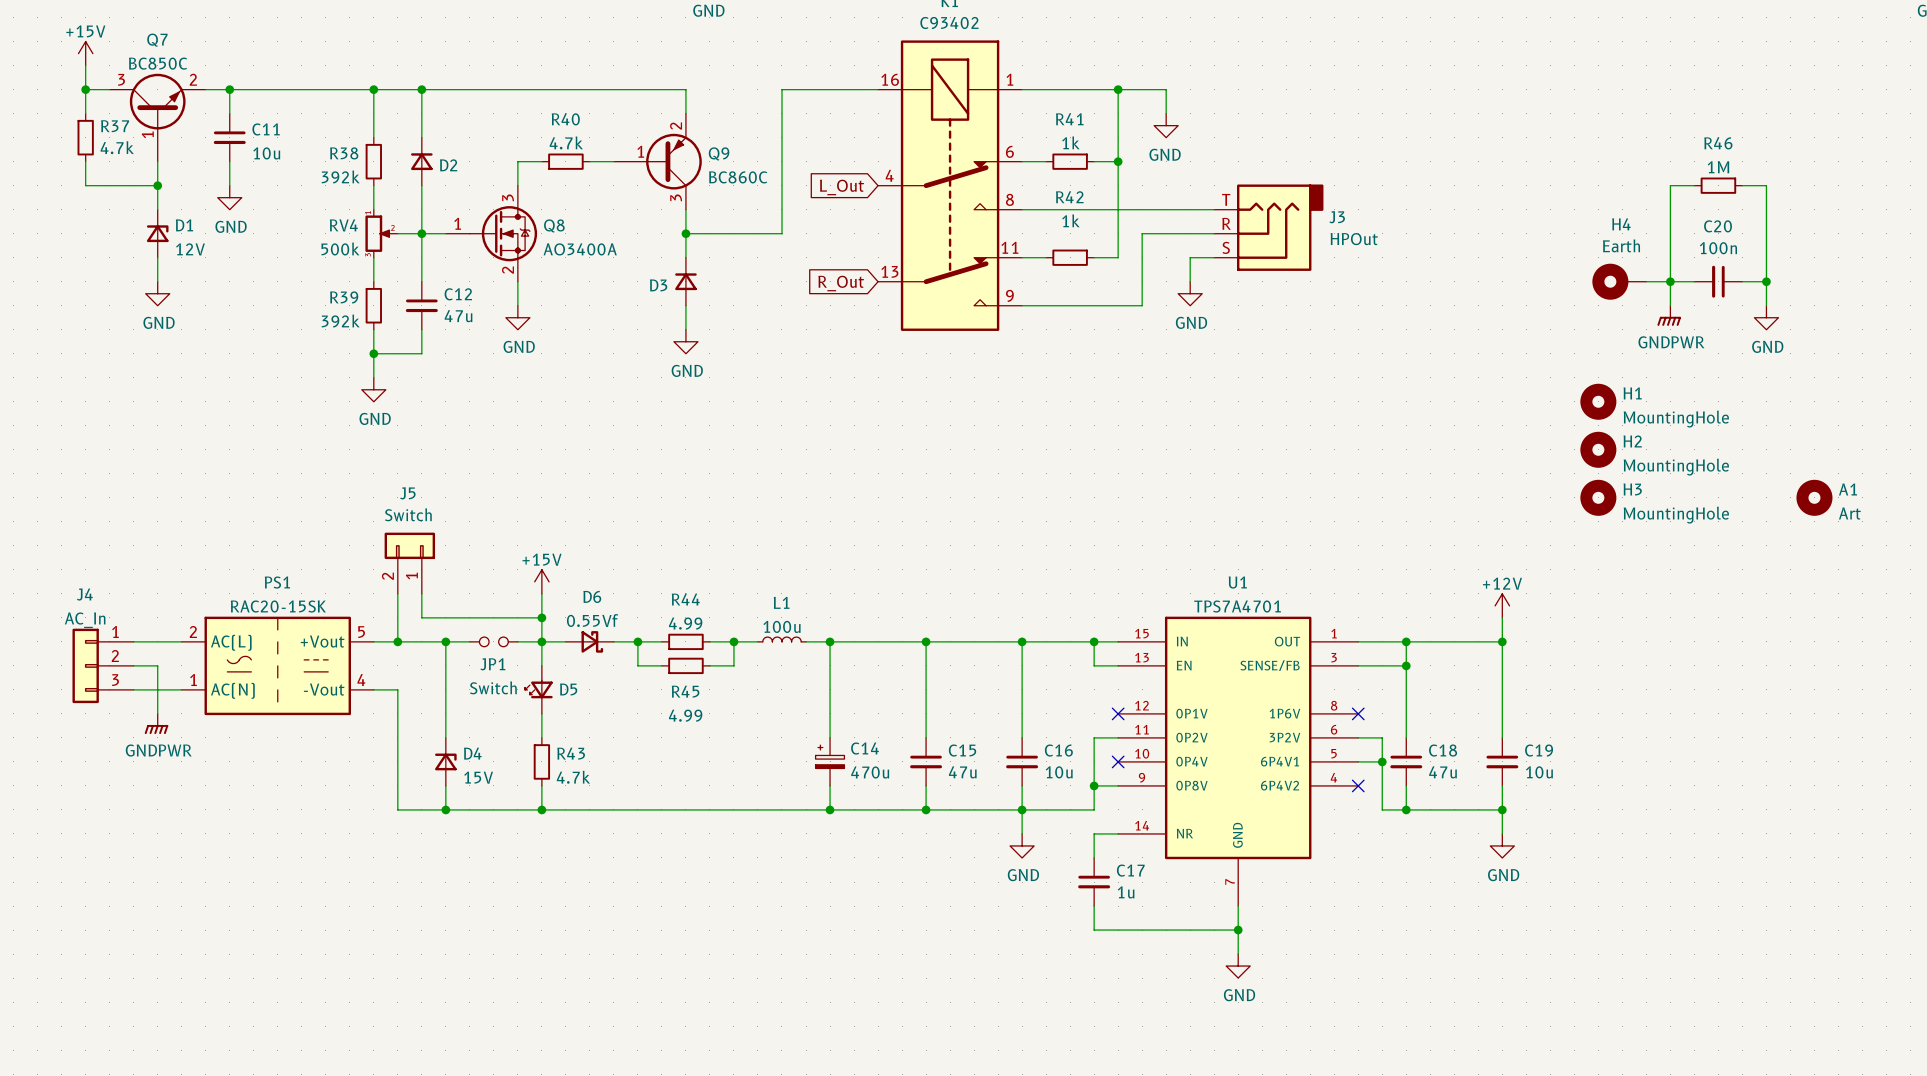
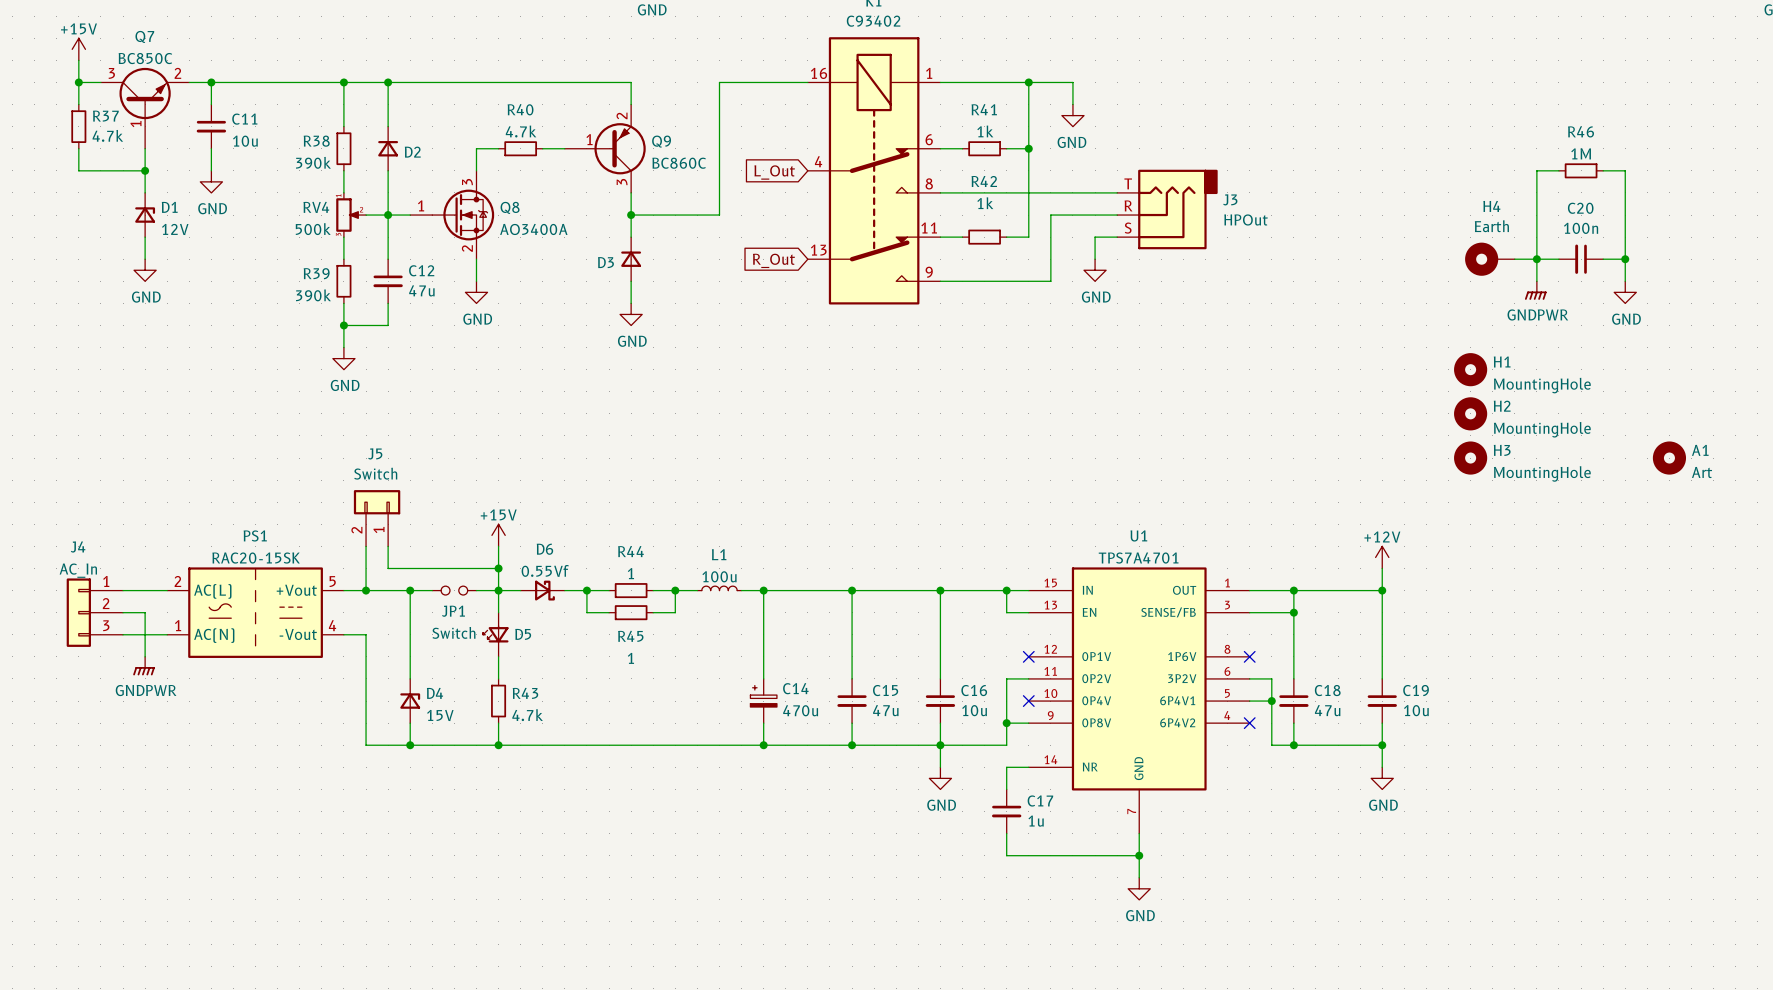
R38 value: 392k (340, 176) -> 390k (313, 162)
R39 value: 392k (340, 321) -> 390k (313, 295)
R44 value: 4.99 (685, 623) -> 1 (630, 573)
R45 value: 4.99 (685, 715) -> 1 (630, 658)

